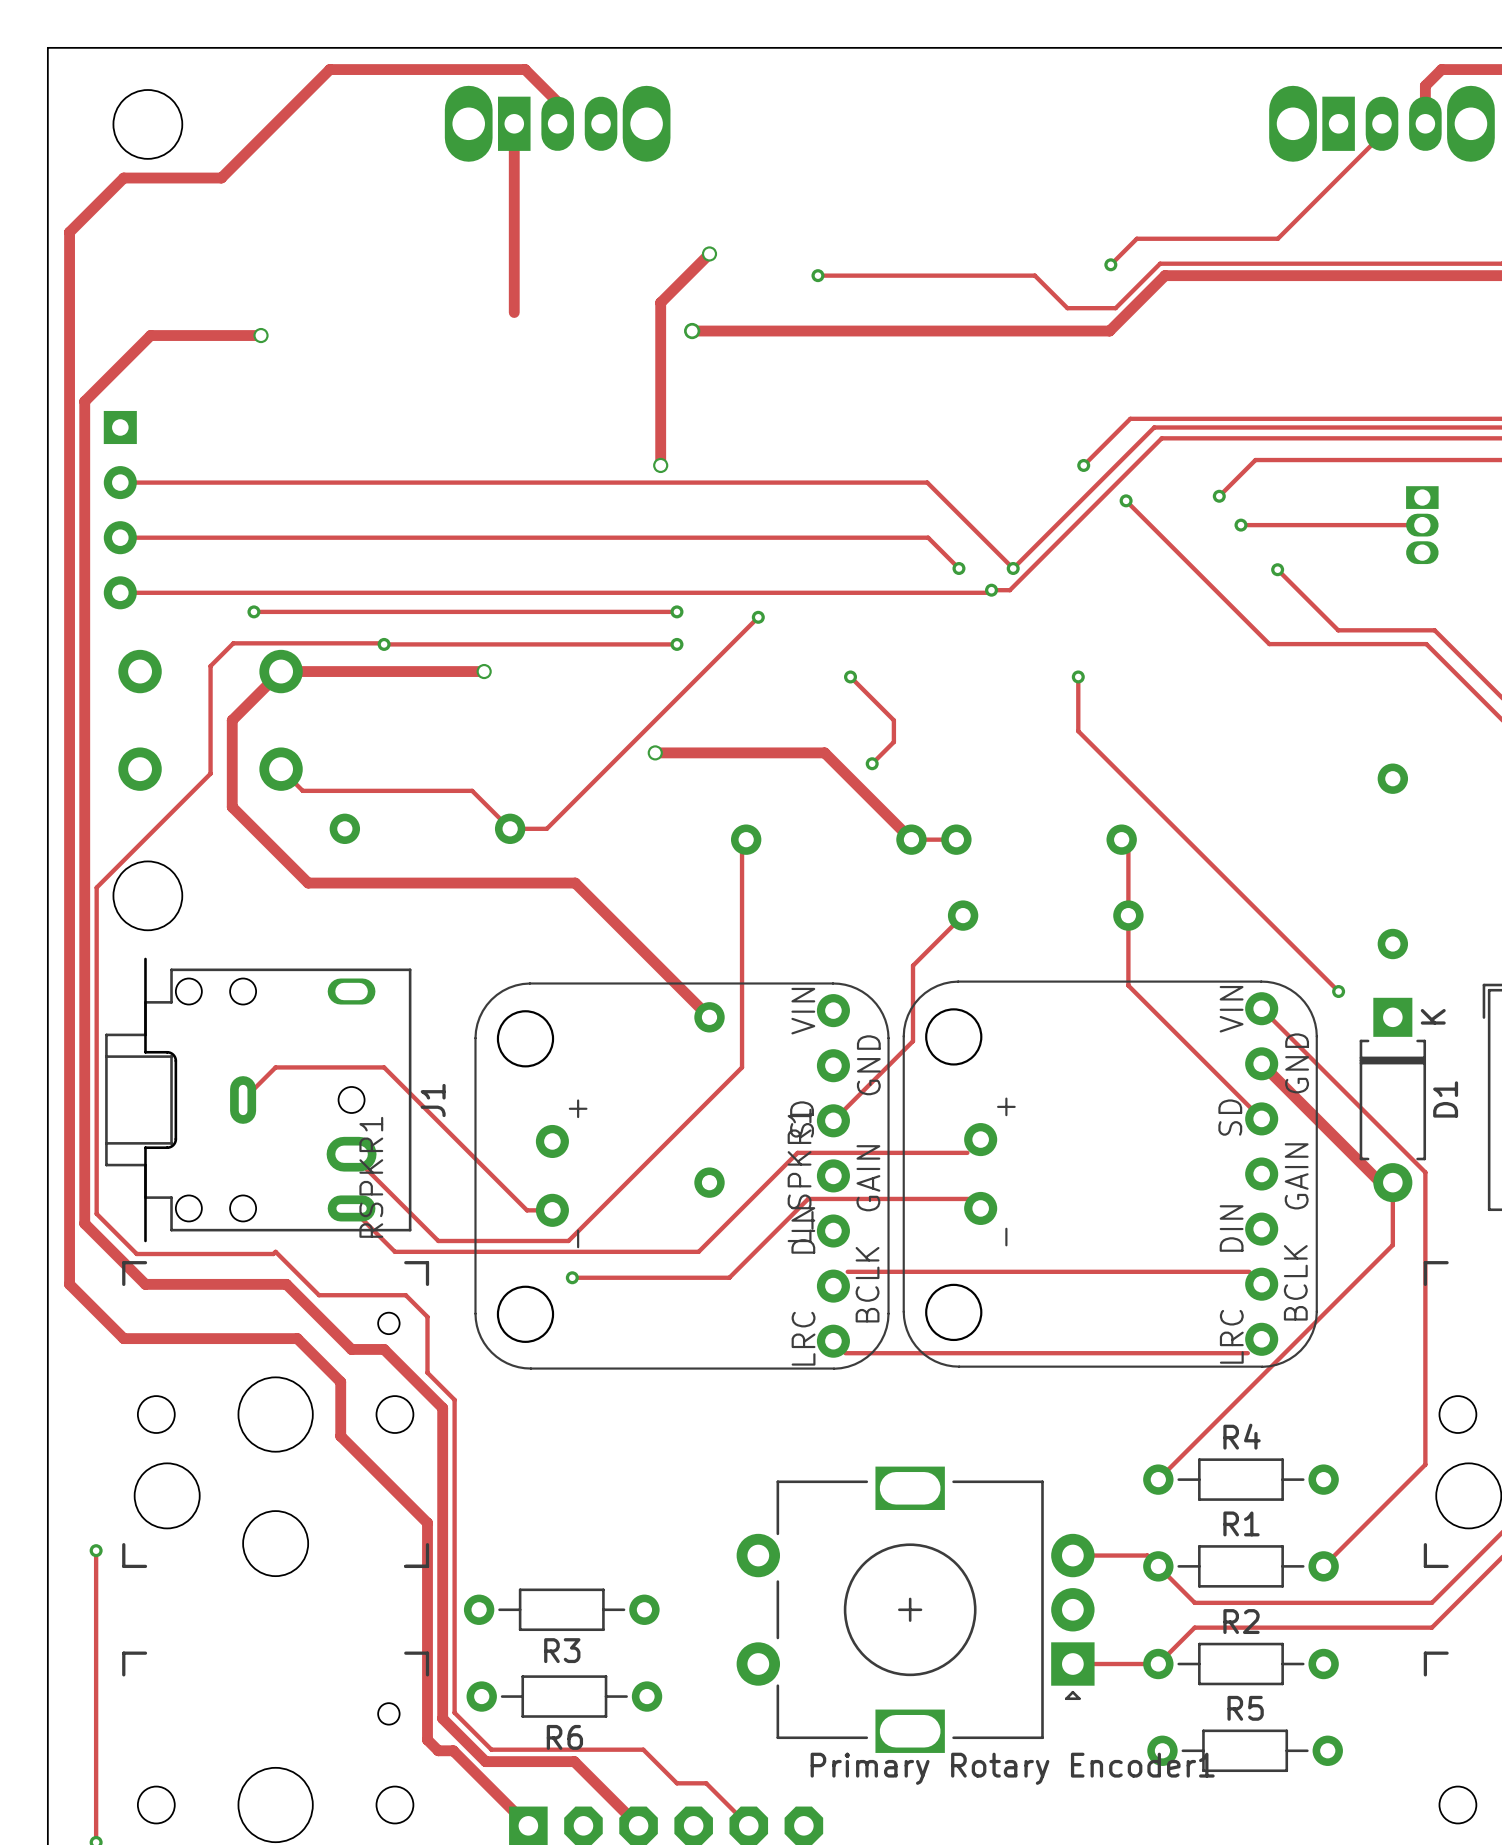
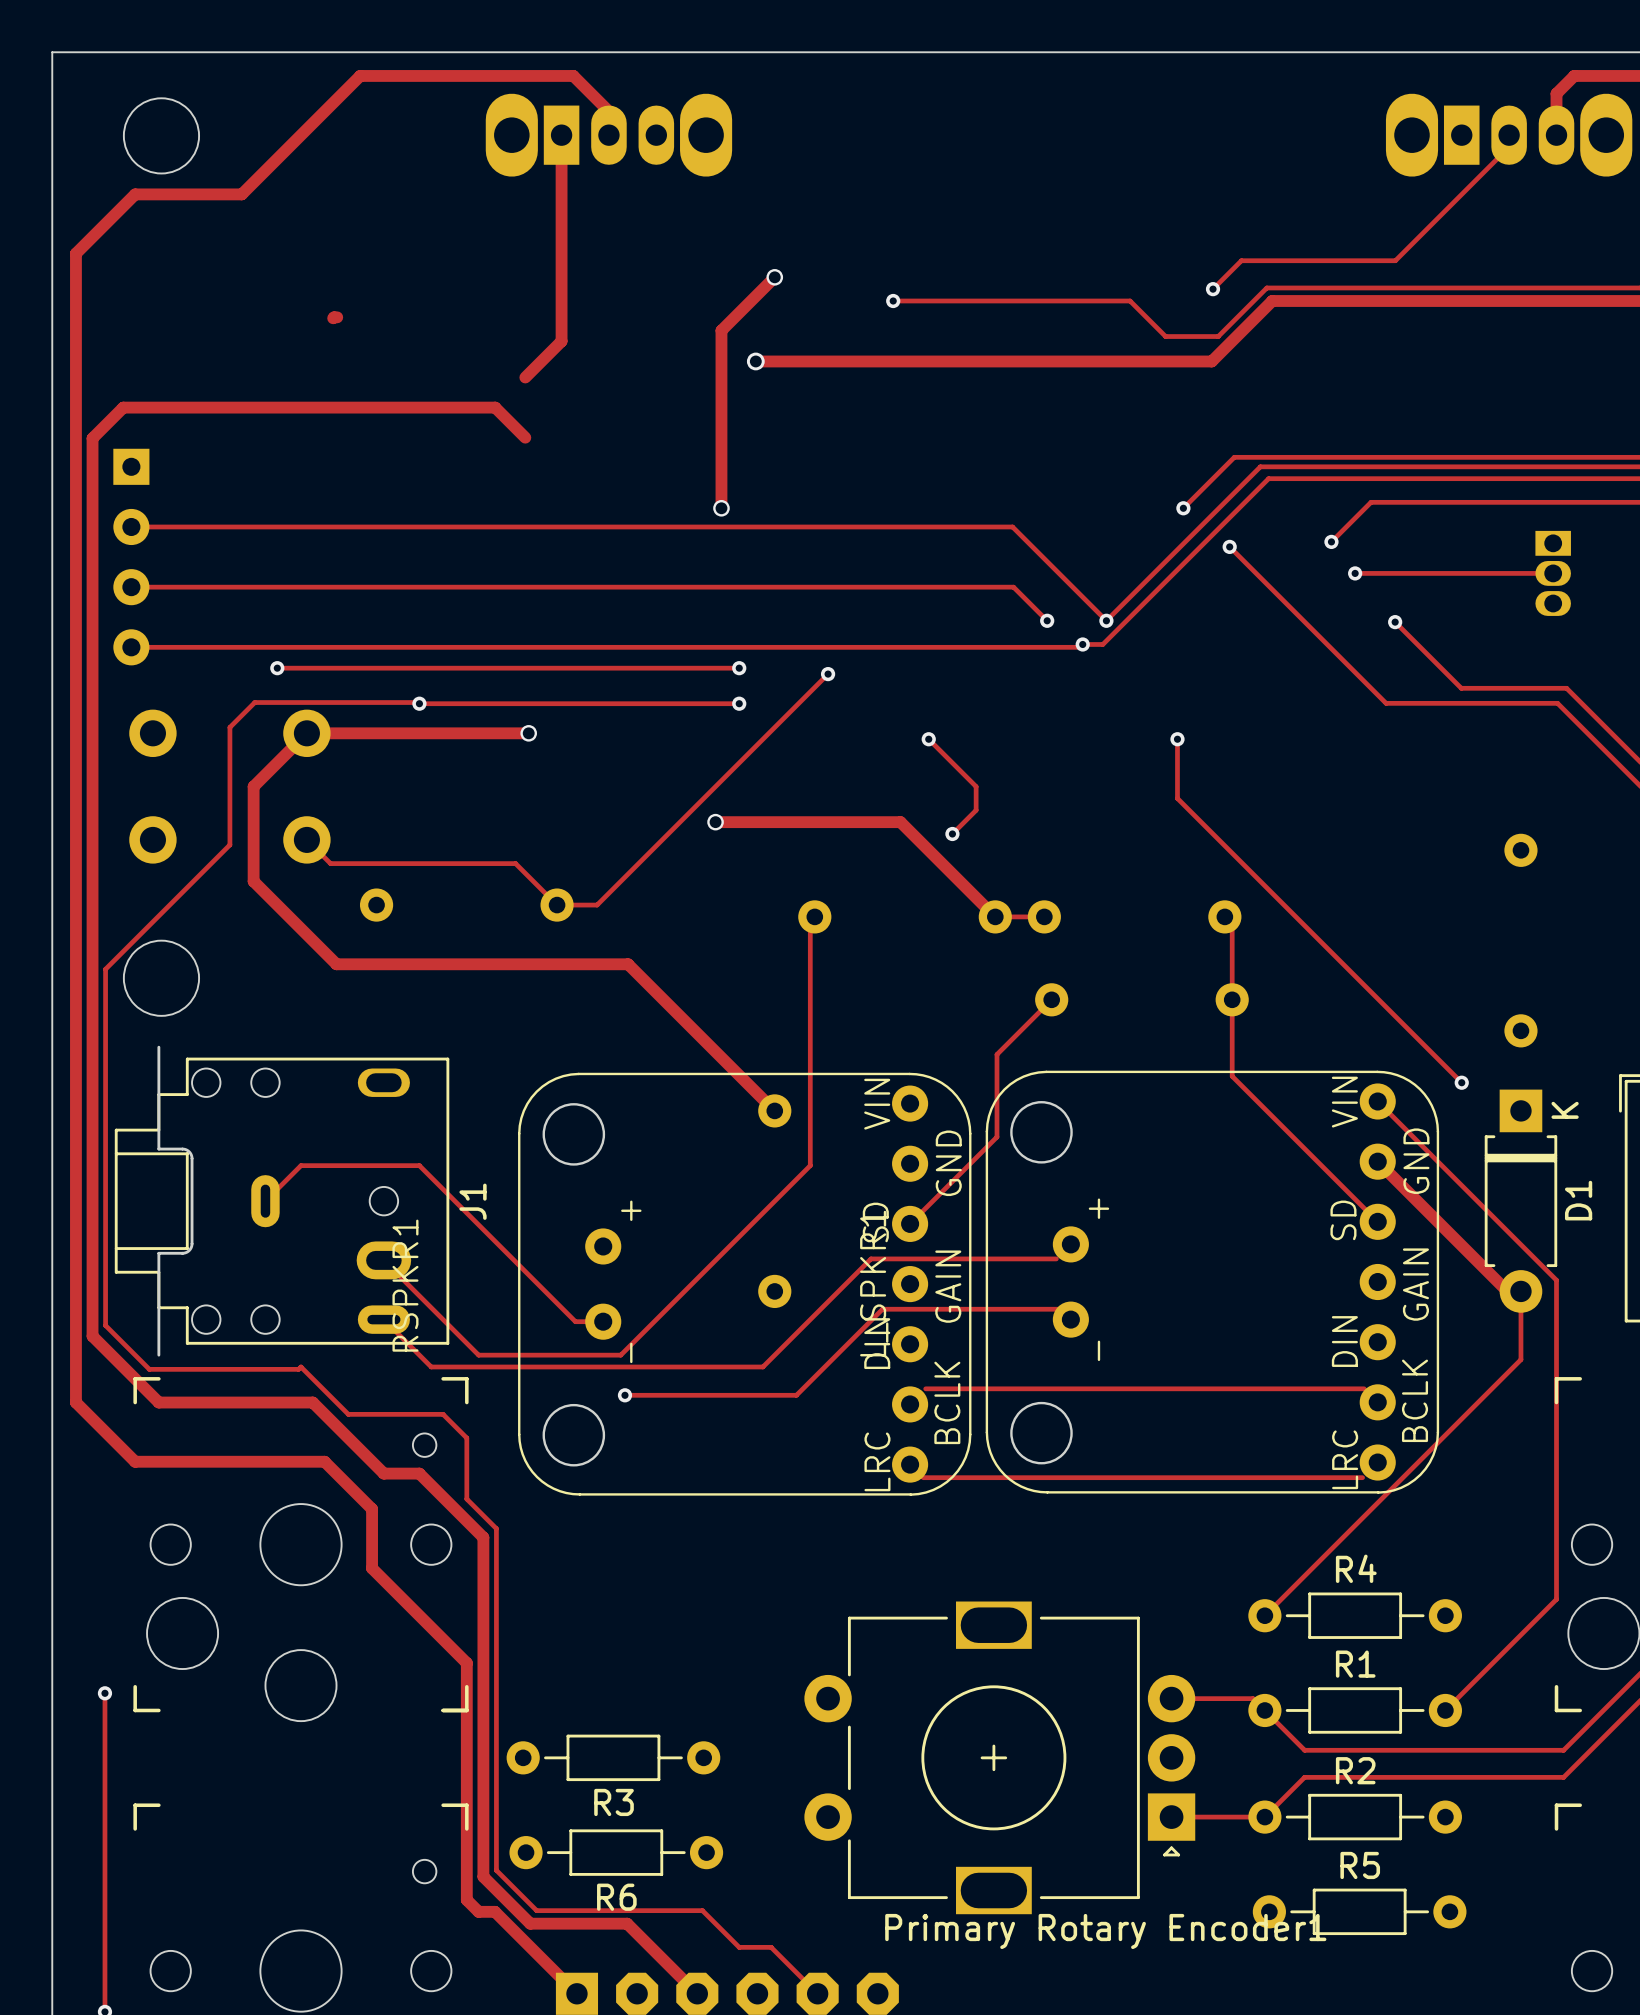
track: none -> (337, 317) (333, 318)
track: none -> (561, 341) (525, 377)
track: (261, 335) (150, 335) (112, 373) -> (525, 437) (495, 407) (123, 407)
via: (261, 335) -> none

